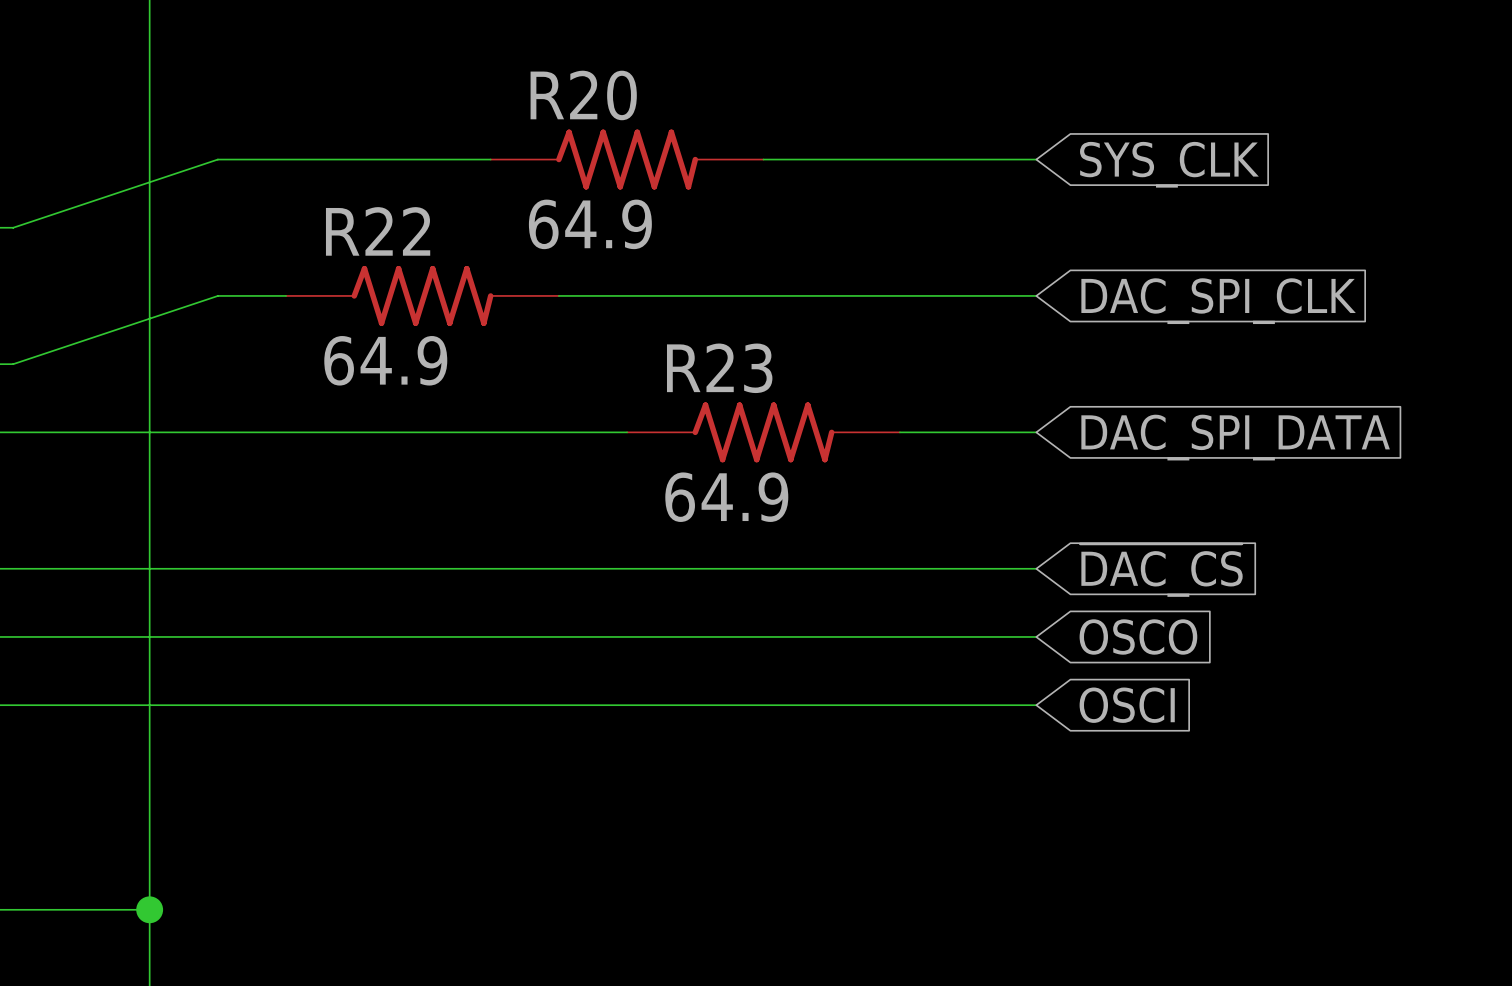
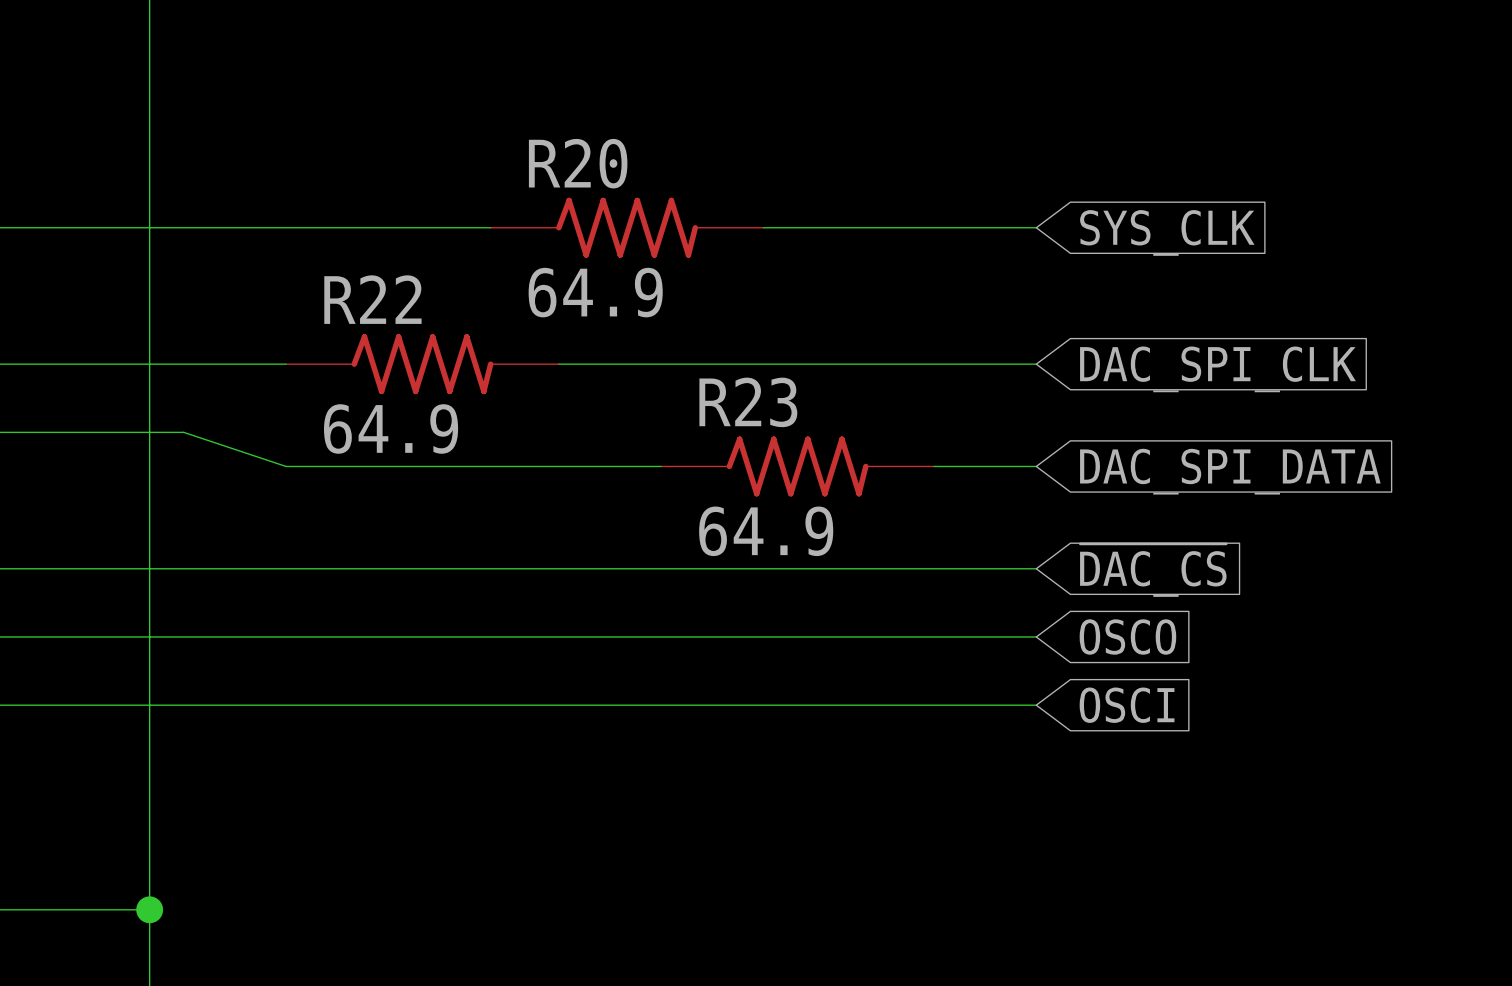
wire: (490, 159) (217, 159) (13, 227) -> (490, 227) (13, 227)
R20 position: (627, 159) -> (627, 227)
wire: (763, 159) (1036, 159) -> (763, 227) (1036, 227)
global label position: SYS_CLK (1169, 164) -> SYS_CLK (1167, 232)
wire: (286, 295) (217, 295) (13, 364) -> (286, 364) (13, 364)
R22 position: (422, 295) -> (422, 364)
wire: (558, 295) (1036, 295) -> (558, 364) (1036, 364)
global label position: DAC_SPI_CLK (1218, 301) -> DAC_SPI_CLK (1217, 369)
wire: (183, 432) (627, 432) -> (183, 432) (286, 466) (661, 466)
R23 position: (763, 432) -> (797, 466)
wire: (899, 432) (1036, 432) -> none
global label position: DAC_SPI_DATA (1235, 437) -> DAC_SPI_DATA (1230, 471)
wire: none -> (934, 466) (1036, 466)

